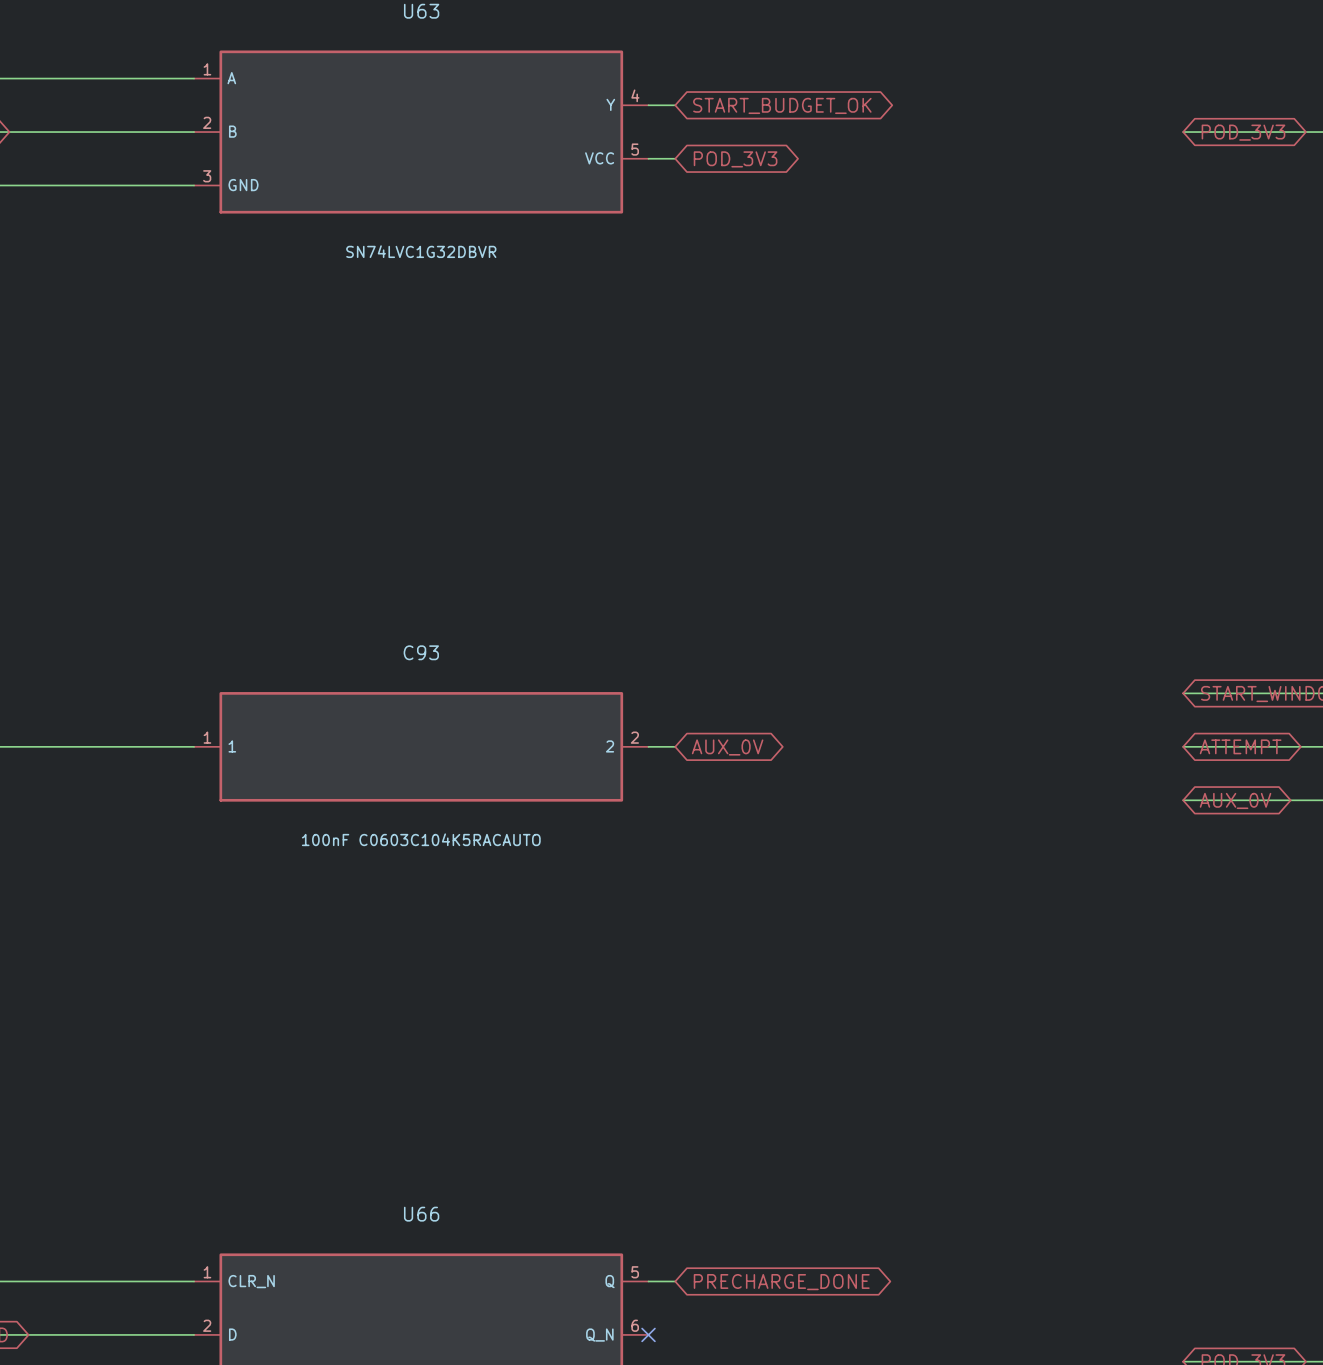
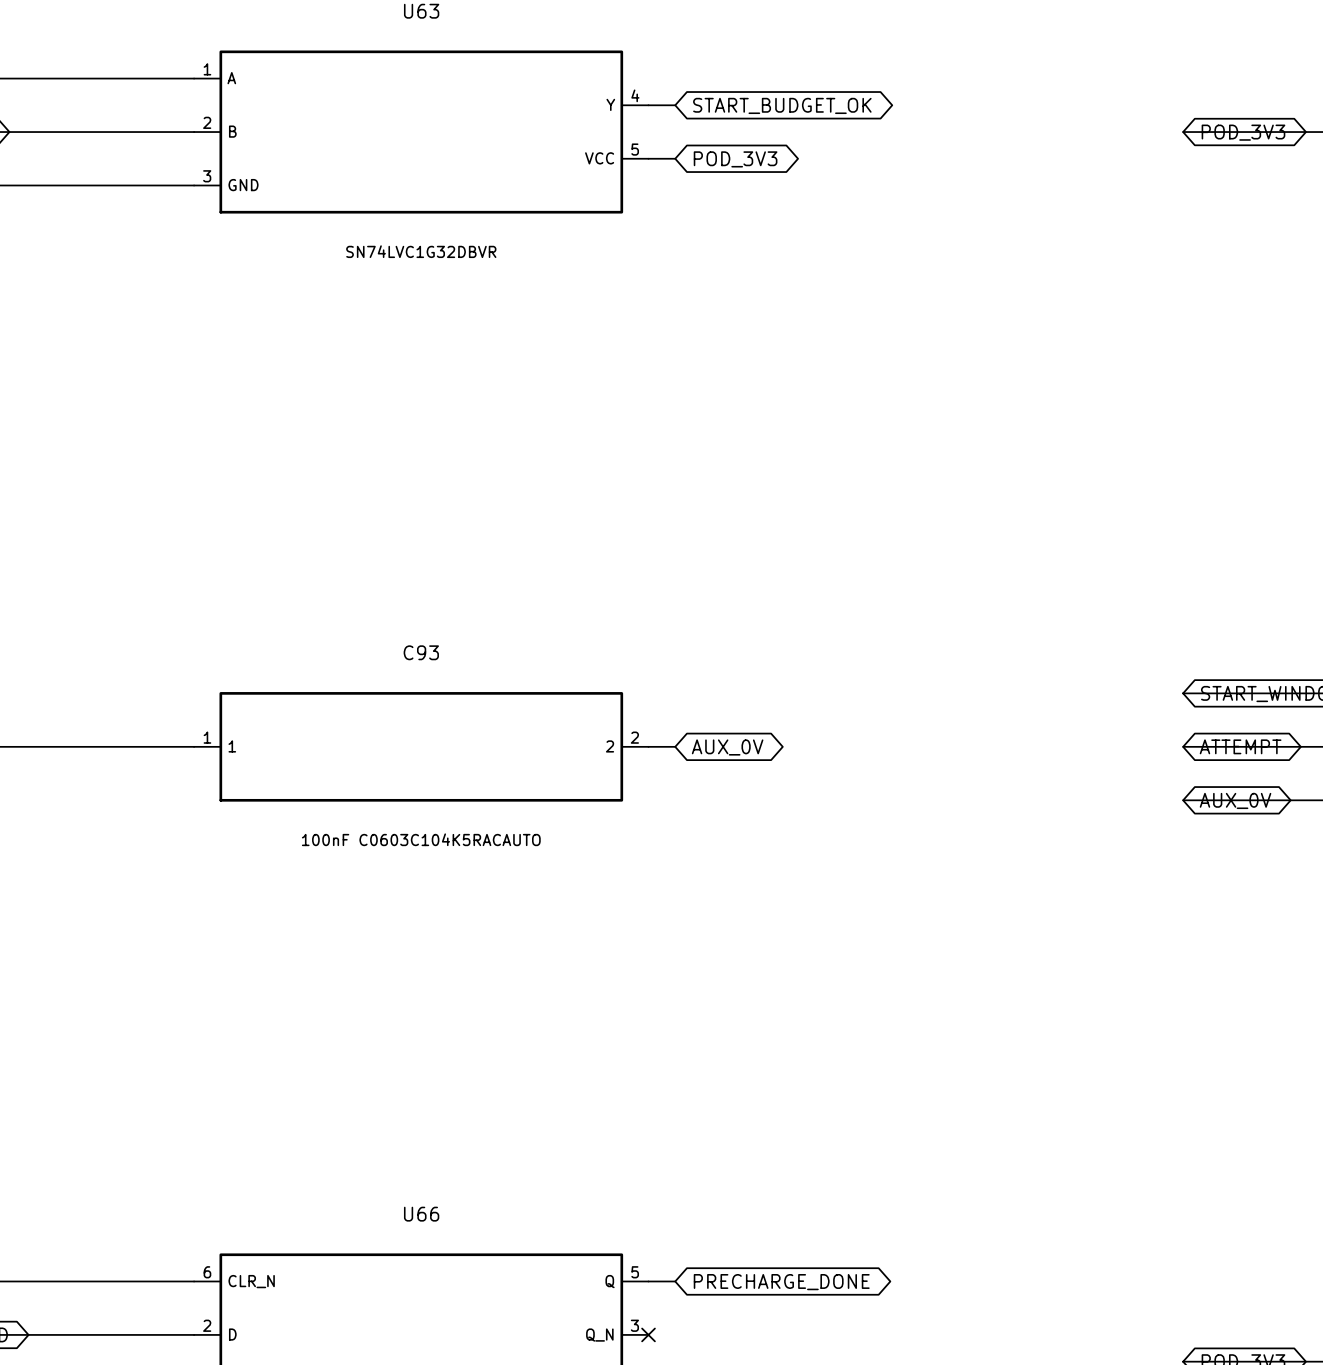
U66 pin number: 1 (207, 1272) -> 6 (207, 1272)
U66 pin number: 6 (635, 1325) -> 3 (634, 1325)

